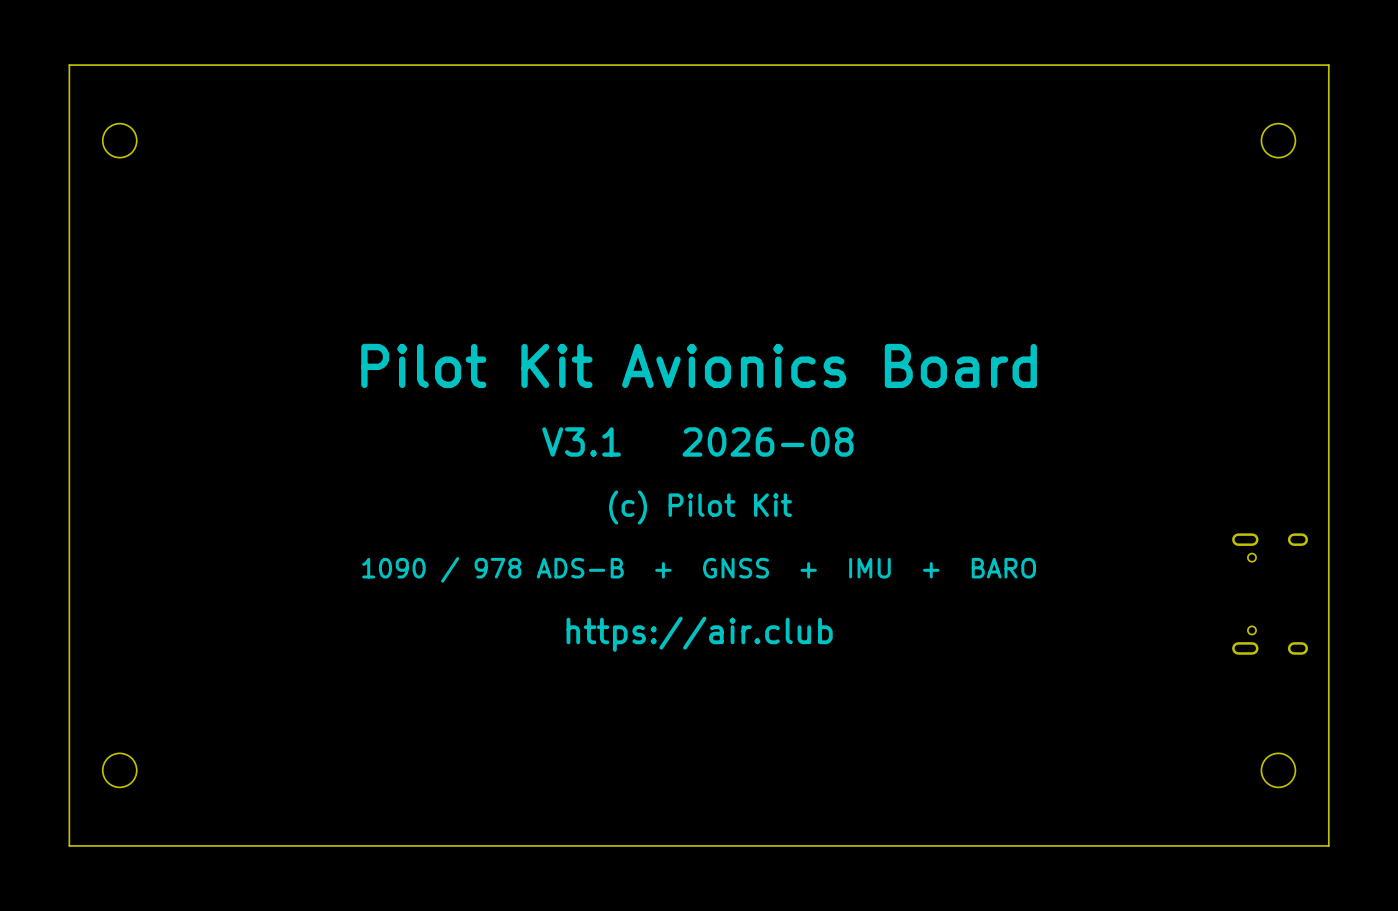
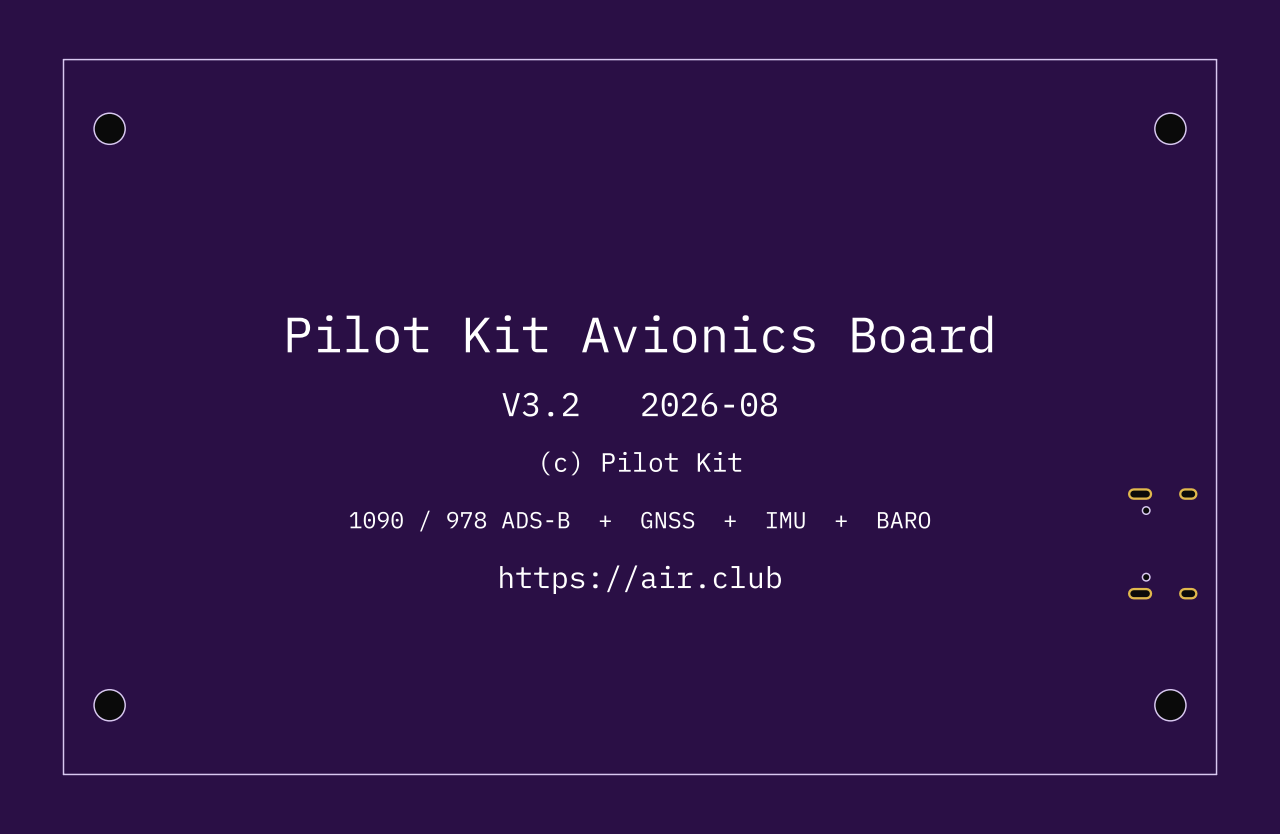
text: V3.1 2026-08 (697, 441) -> V3.2 2026-08 (639, 404)

